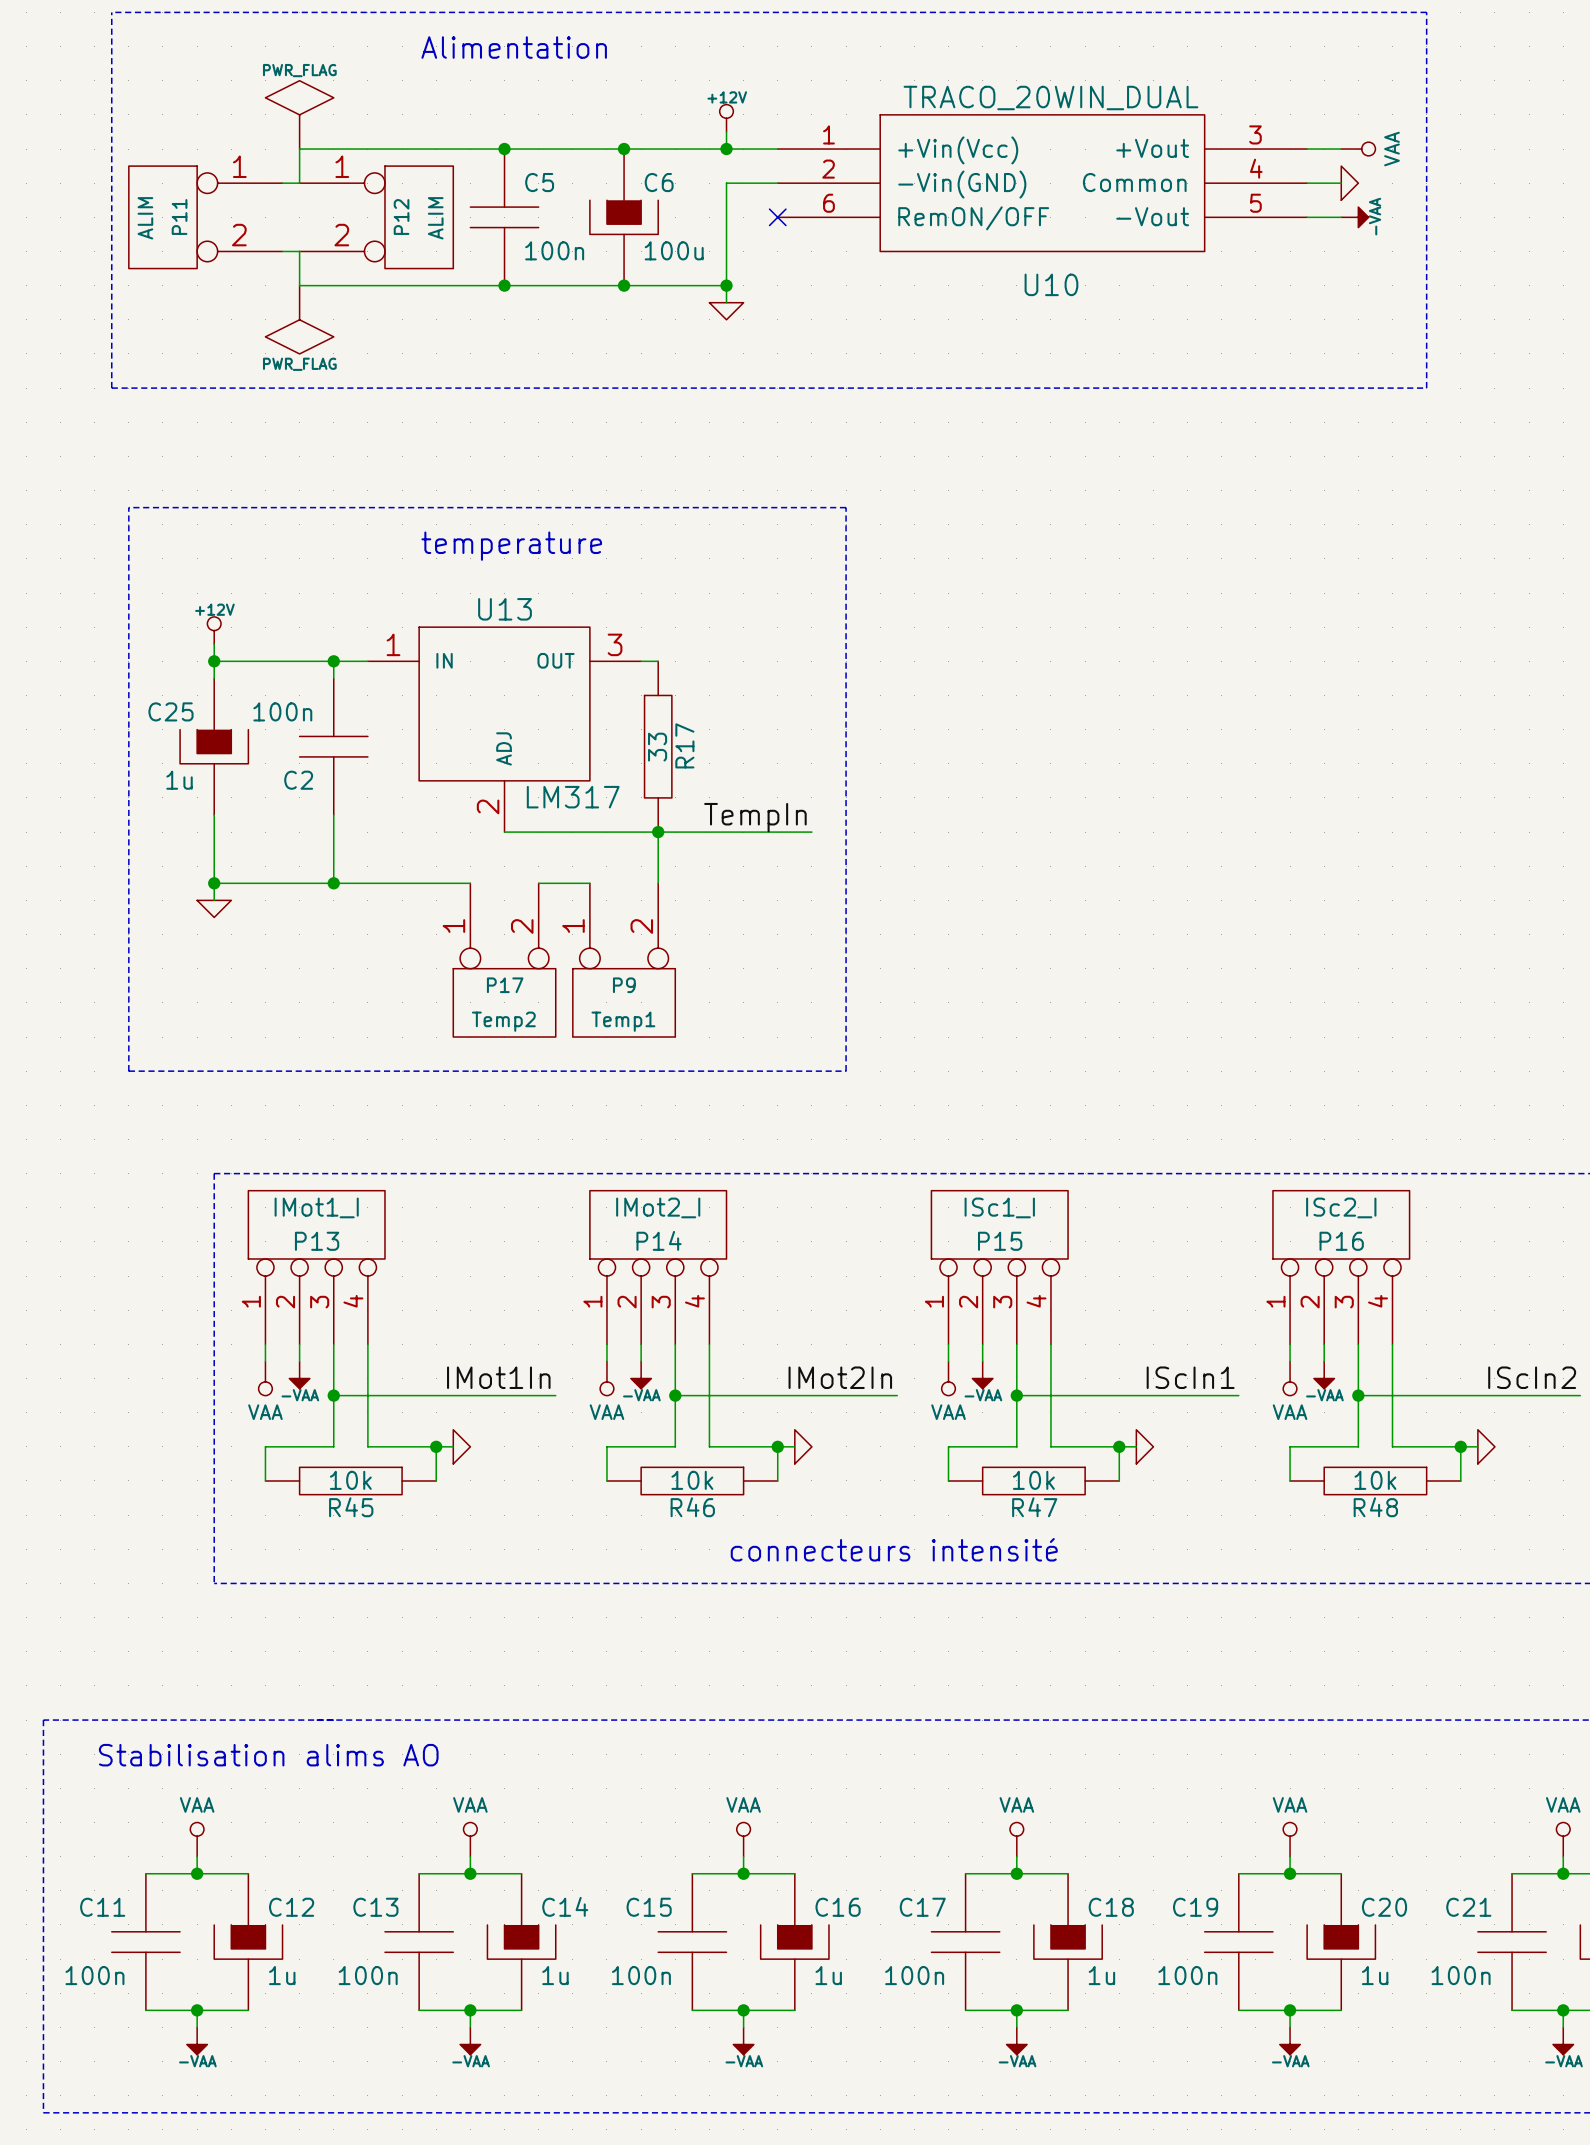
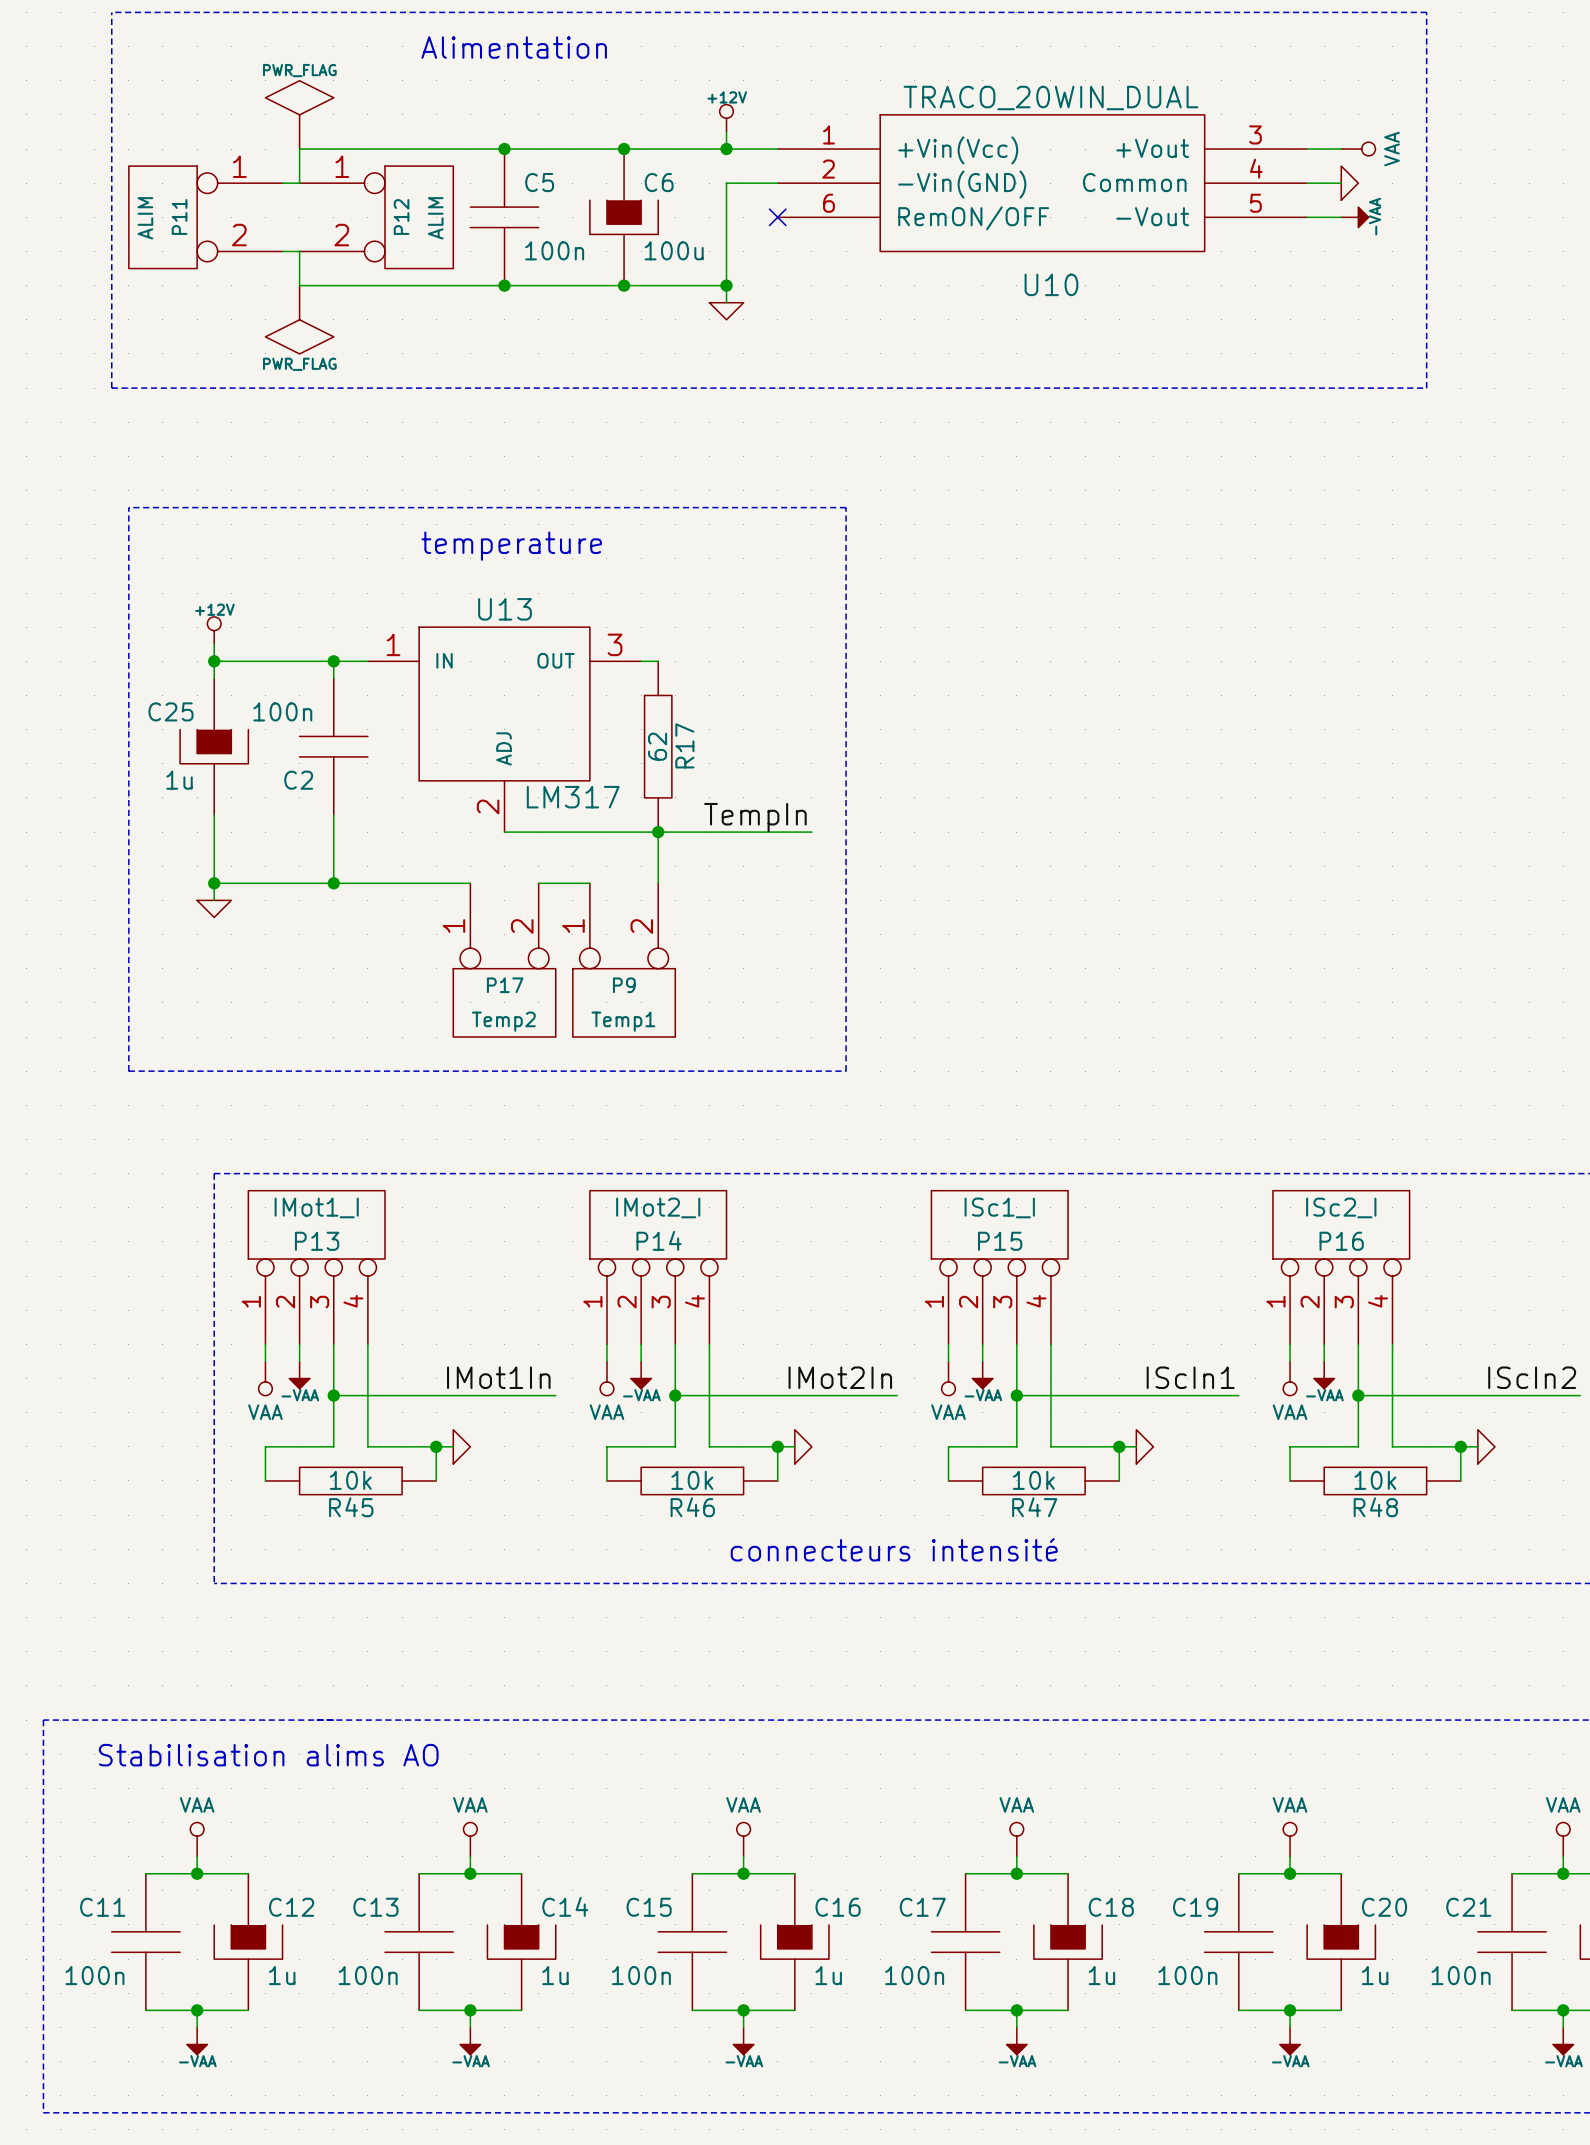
R17 value: 33 (657, 747) -> 62 (657, 746)

